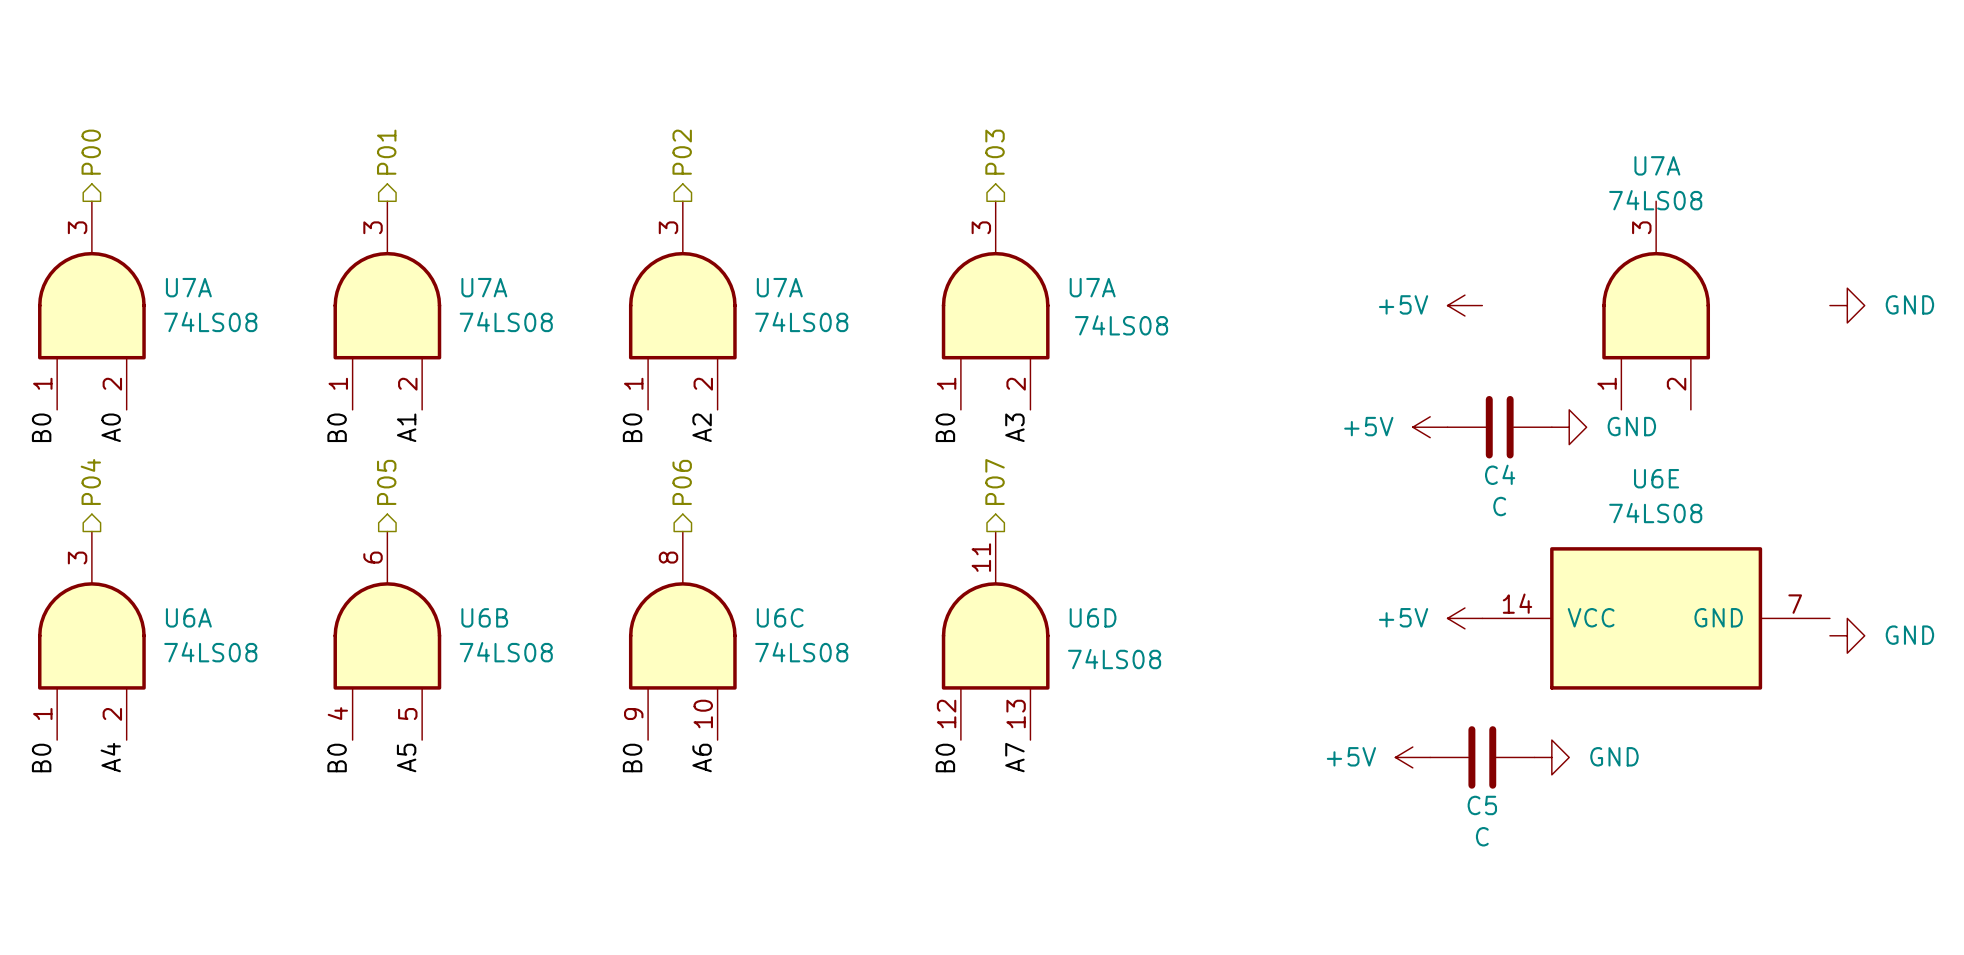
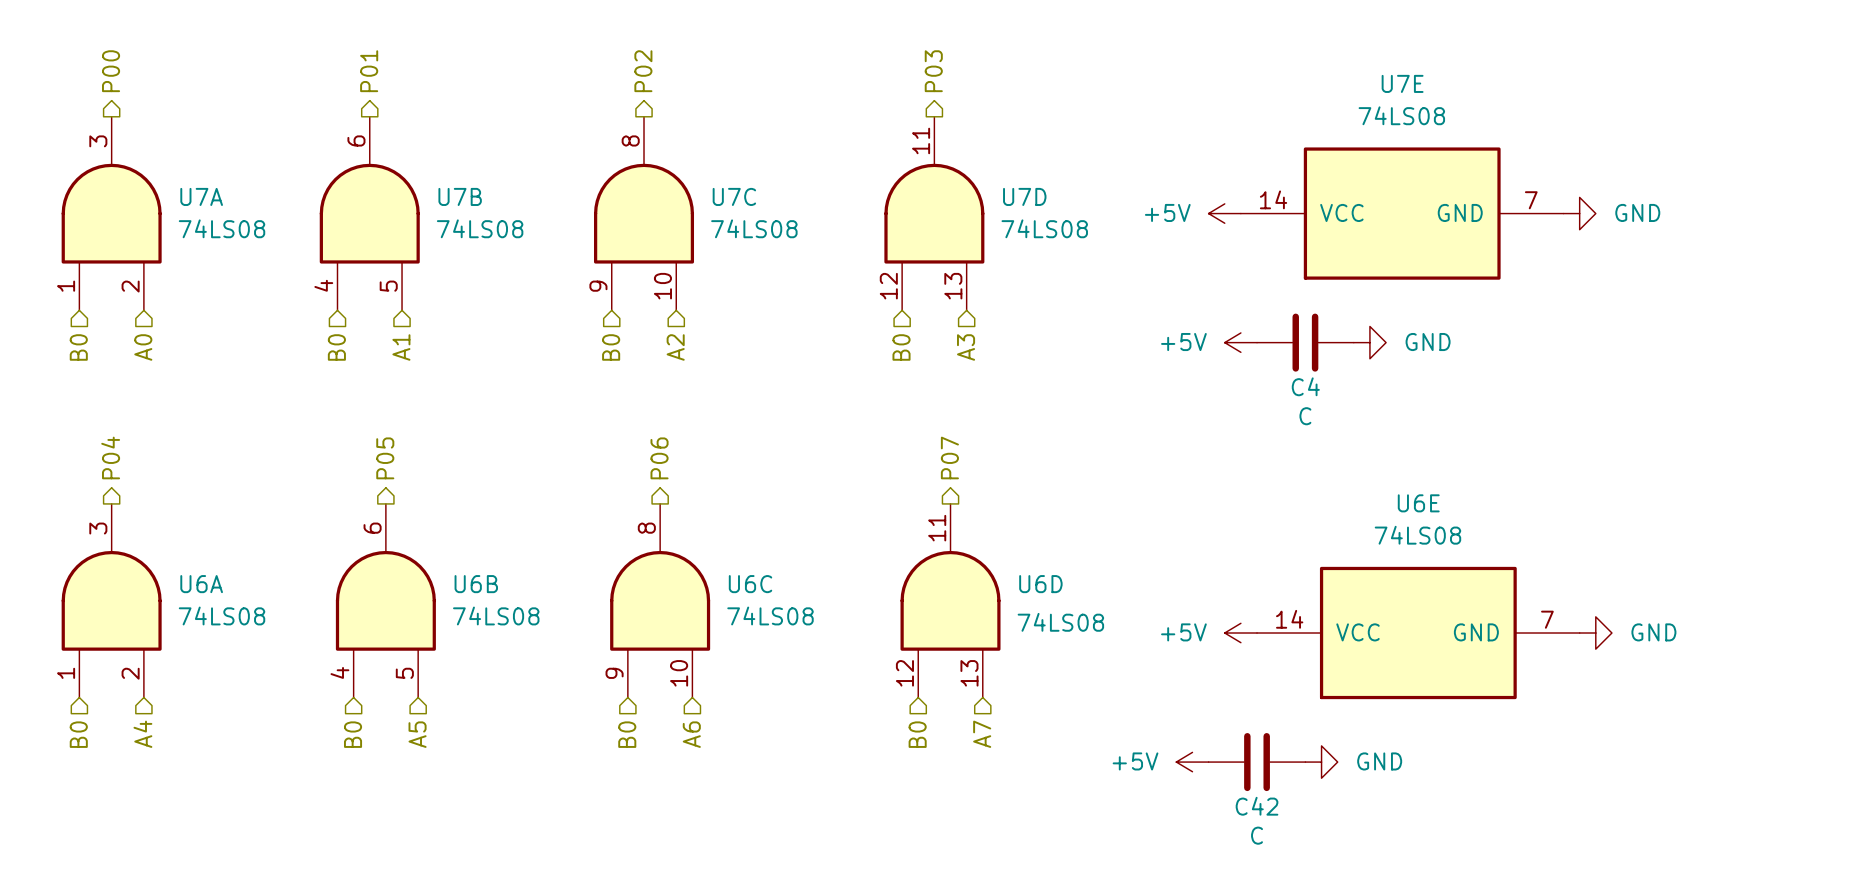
hierarchical label position: P00 (91, 152) -> P00 (111, 71)
hierarchical label position: P01 (386, 152) -> P01 (369, 71)
hierarchical label position: P02 (682, 152) -> P02 (643, 71)
hierarchical label position: P03 (995, 152) -> P03 (933, 71)
U7B: none -> 74LS08 (369, 213)
U7C: none -> 74LS08 (644, 213)
U7D: none -> 74LS08 (934, 213)
power symbol: none -> +5V (1224, 213)
U7E: none -> 74LS08 (1402, 213)
power symbol: none -> GND (1579, 213)
U7A position: (91, 305) -> (111, 213)
U7A: 74LS08 (387, 305) -> none
U7A: 74LS08 (682, 305) -> none
U7A: 74LS08 (995, 305) -> none
power symbol: +5V (1464, 305) -> none
U7A: 74LS08 (1656, 305) -> none
power symbol: GND (1847, 305) -> none
power symbol: none -> +5V (1240, 342)
power symbol: none -> GND (1369, 342)
hierarchical label: none -> B0 (78, 347)
hierarchical label: none -> A0 (143, 347)
hierarchical label: none -> B0 (336, 347)
hierarchical label: none -> A1 (401, 347)
hierarchical label: none -> B0 (611, 347)
hierarchical label: none -> A2 (675, 347)
hierarchical label: none -> B0 (901, 347)
hierarchical label: none -> A3 (966, 347)
label: B0 (41, 427) -> none
label: A0 (111, 427) -> none
label: B0 (337, 427) -> none
label: A1 (406, 427) -> none
label: B0 (632, 427) -> none
label: A2 (702, 427) -> none
label: B0 (945, 427) -> none
label: A3 (1014, 427) -> none
power symbol: +5V (1430, 427) -> none
C4 position: (1499, 427) -> (1305, 342)
power symbol: GND (1569, 427) -> none
power symbol: +5V (1464, 618) -> none
U6E position: (1656, 618) -> (1418, 633)
power symbol: GND (1847, 635) -> none
power symbol: none -> +5V (1240, 633)
power symbol: none -> GND (1595, 633)
label: A4 (110, 757) -> none
label: A7 (1014, 757) -> none
power symbol: +5V (1412, 757) -> none
C5: C (1482, 757) -> none
power symbol: GND (1551, 757) -> none
label: B0 (41, 758) -> none
label: B0 (337, 758) -> none
label: A5 (406, 758) -> none
label: B0 (632, 758) -> none
label: A6 (702, 758) -> none
label: B0 (945, 758) -> none
hierarchical label: none -> A4 (142, 734)
hierarchical label: none -> A7 (982, 734)
hierarchical label: none -> B0 (78, 734)
hierarchical label: none -> B0 (353, 734)
hierarchical label: none -> A5 (417, 734)
hierarchical label: none -> B0 (627, 734)
hierarchical label: none -> A6 (691, 734)
hierarchical label: none -> B0 (917, 734)
power symbol: none -> +5V (1192, 762)
C42: none -> C (1257, 762)
power symbol: none -> GND (1321, 762)

